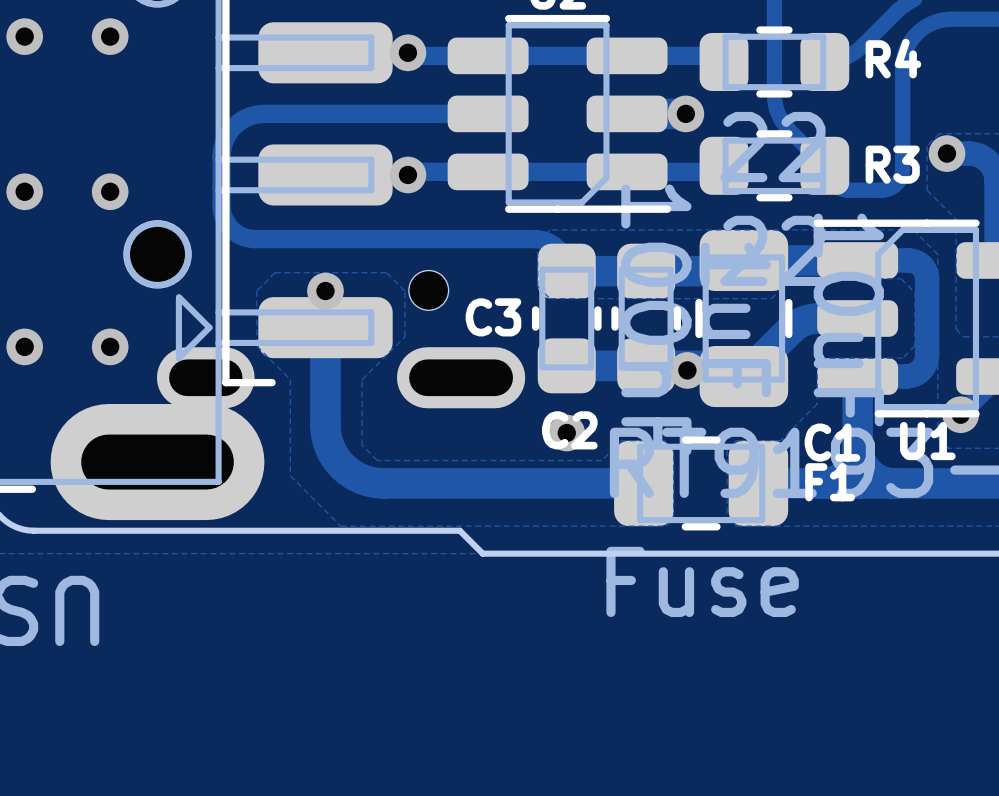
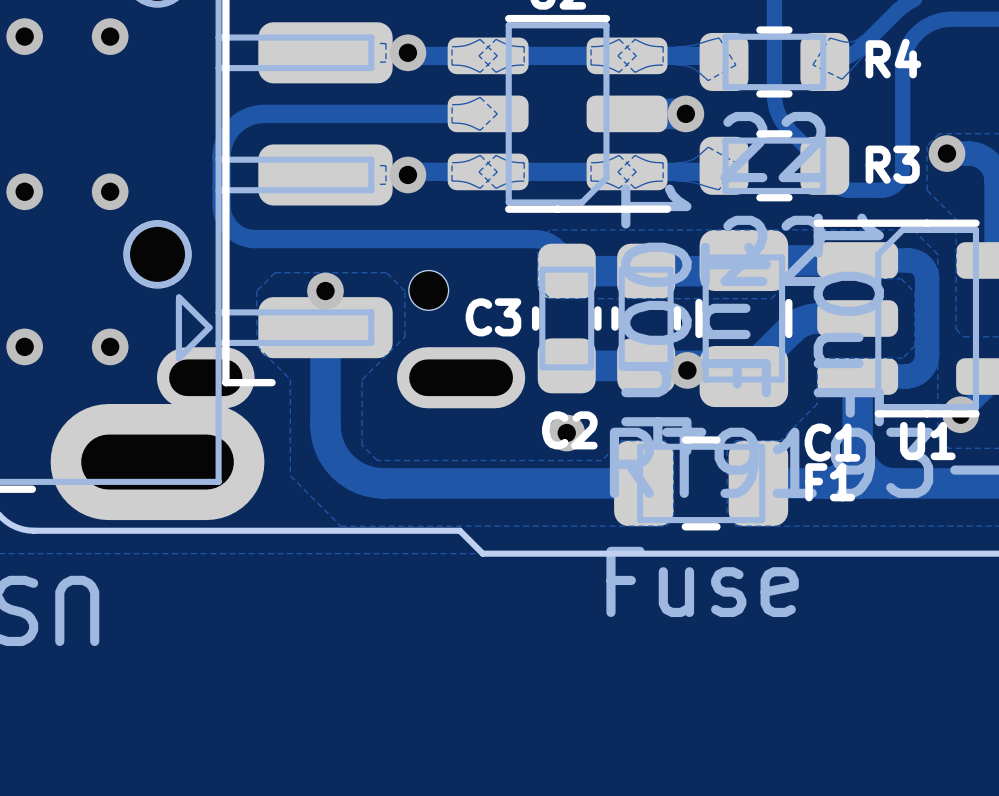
zone outline: none -> (861, 35) (849, 42) (830, 38) (812, 64) (842, 79) (872, 46) (861, 35)
zone outline: none -> (719, 38) (691, 45) (675, 46) (675, 65) (691, 67) (708, 80) (735, 65) (719, 38)
zone outline: none -> (480, 39) (465, 45) (452, 46) (452, 65) (465, 66) (480, 72) (497, 55) (480, 39)
zone outline: none -> (496, 39) (478, 55) (496, 72) (511, 66) (524, 65) (524, 46) (511, 45) (496, 39)
zone outline: none -> (619, 39) (604, 45) (591, 46) (591, 65) (604, 66) (619, 72) (636, 55) (619, 39)
zone outline: none -> (635, 39) (617, 55) (635, 72) (649, 66) (663, 65) (663, 46) (649, 45) (635, 39)
zone outline: none -> (379, 43) (385, 43) (385, 61) (379, 62)
zone outline: none -> (480, 97) (465, 103) (452, 104) (452, 123) (465, 124) (480, 130) (497, 113) (480, 97)
zone outline: none -> (708, 147) (691, 160) (675, 162) (675, 181) (691, 182) (719, 189) (735, 162) (708, 147)
zone outline: none -> (480, 155) (465, 161) (452, 162) (452, 181) (465, 182) (480, 188) (497, 171) (480, 155)
zone outline: none -> (496, 155) (478, 171) (496, 188) (511, 182) (524, 181) (524, 162) (511, 161) (496, 155)
zone outline: none -> (619, 155) (604, 161) (591, 162) (591, 181) (604, 182) (619, 188) (636, 171) (619, 155)
zone outline: none -> (635, 155) (617, 171) (635, 188) (649, 182) (663, 181) (663, 162) (649, 161) (635, 155)
zone outline: none -> (379, 165) (385, 165) (385, 184) (379, 184)

